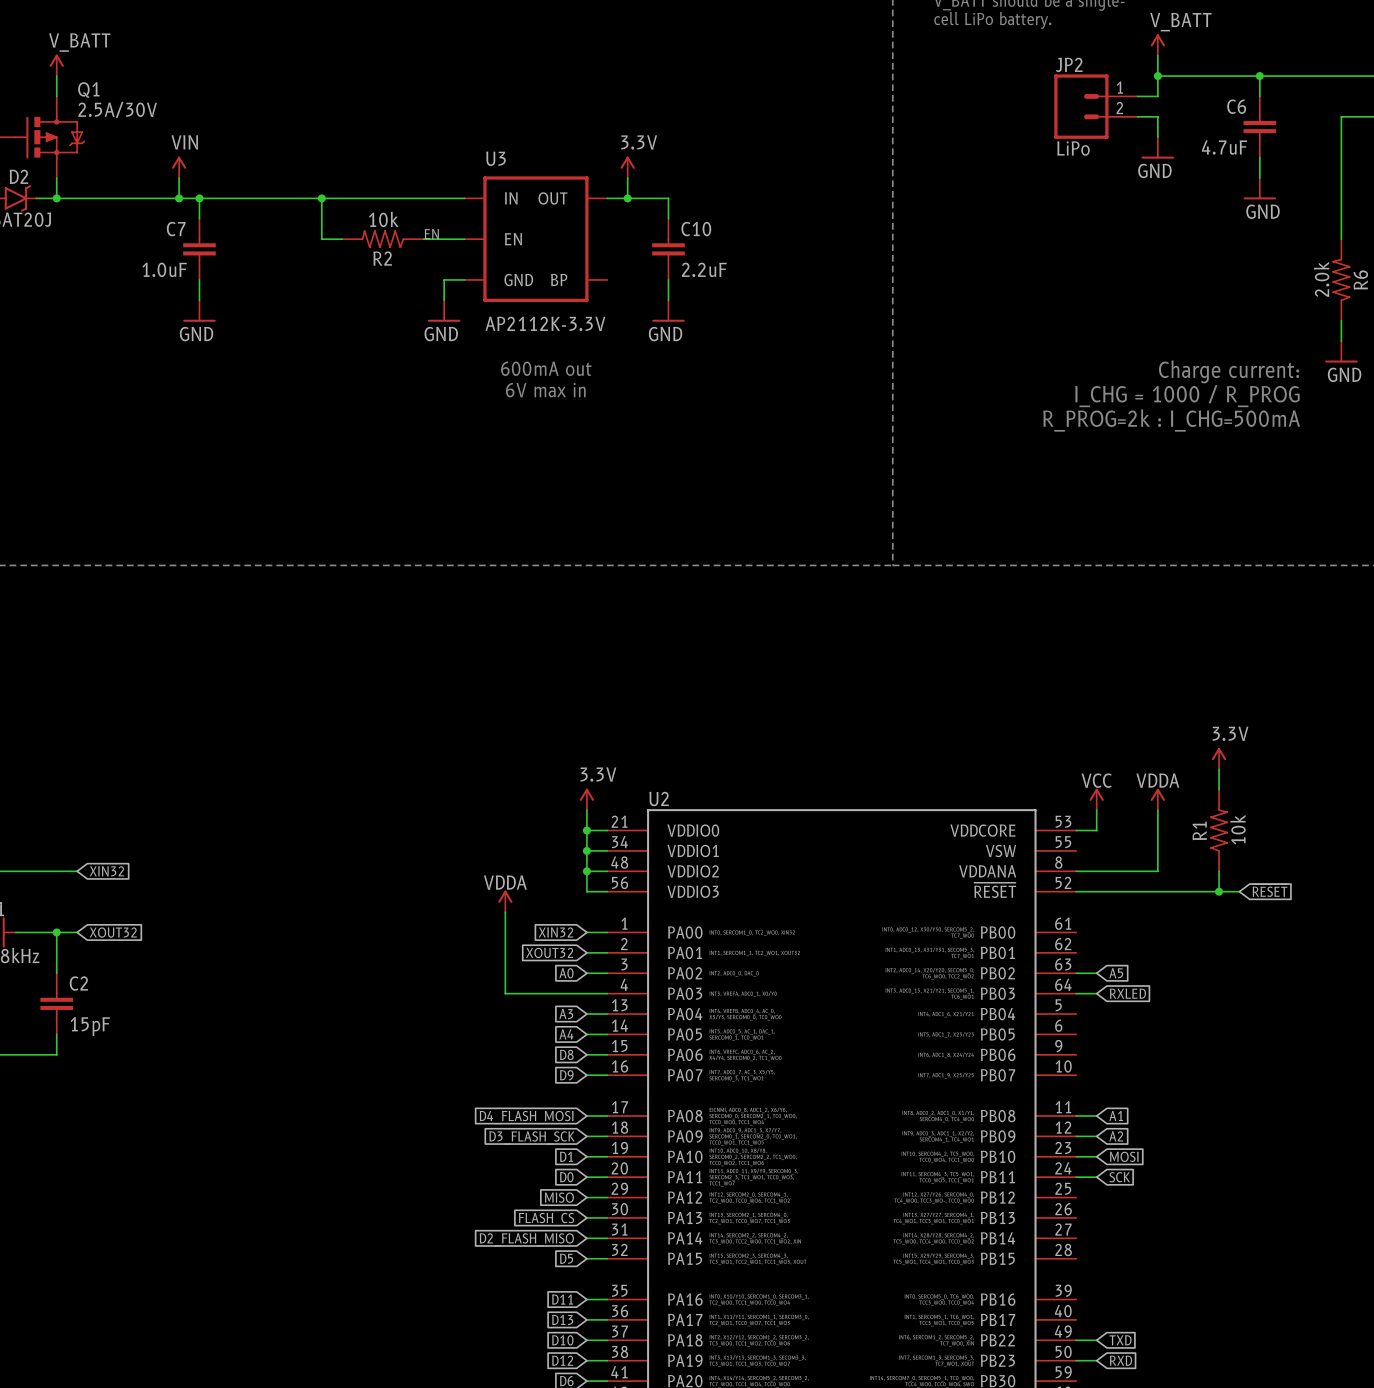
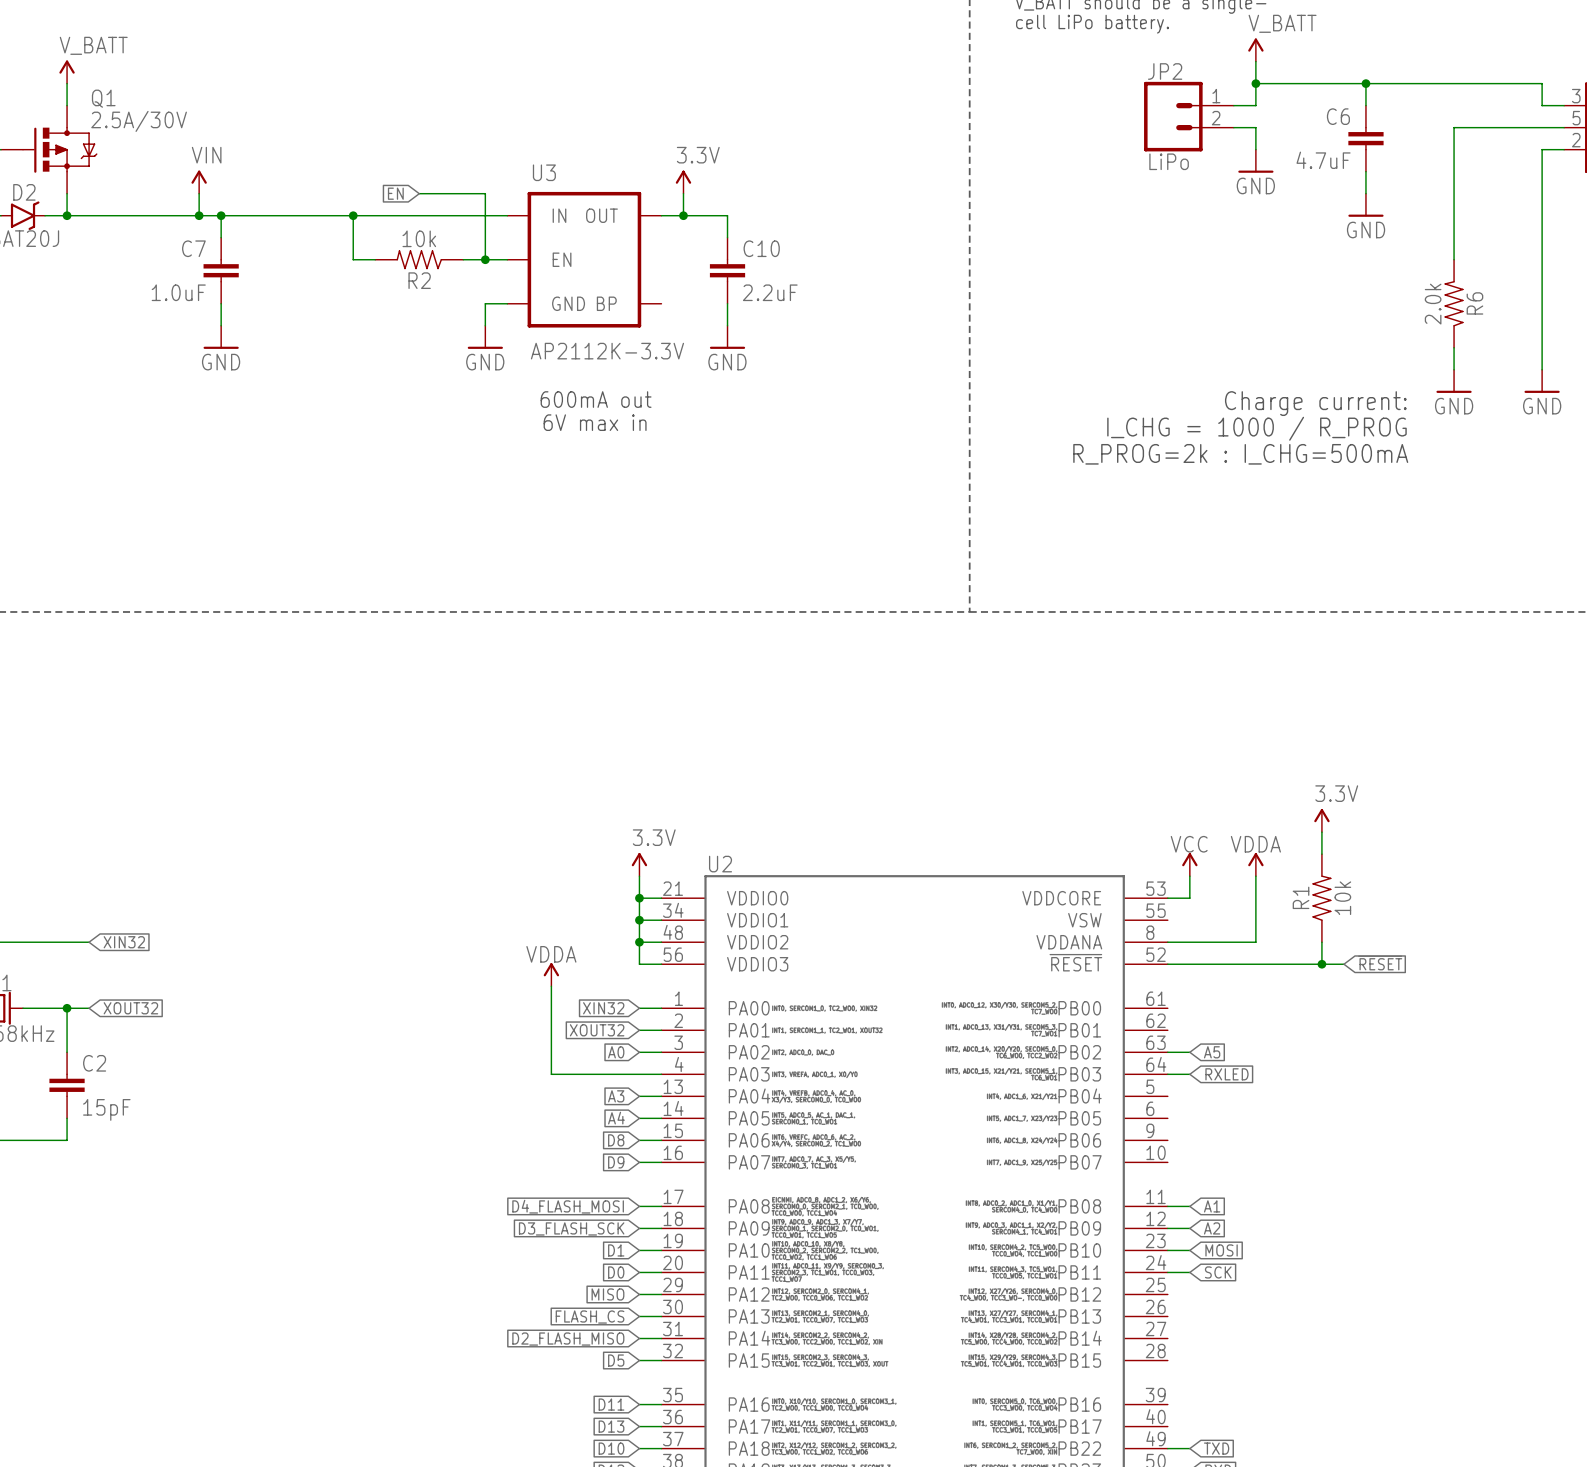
global label: none -> EN (395, 193)
wire: none -> (419, 193) (485, 193) (485, 259)
label: EN (431, 234) -> none
junction: none -> (485, 259)

